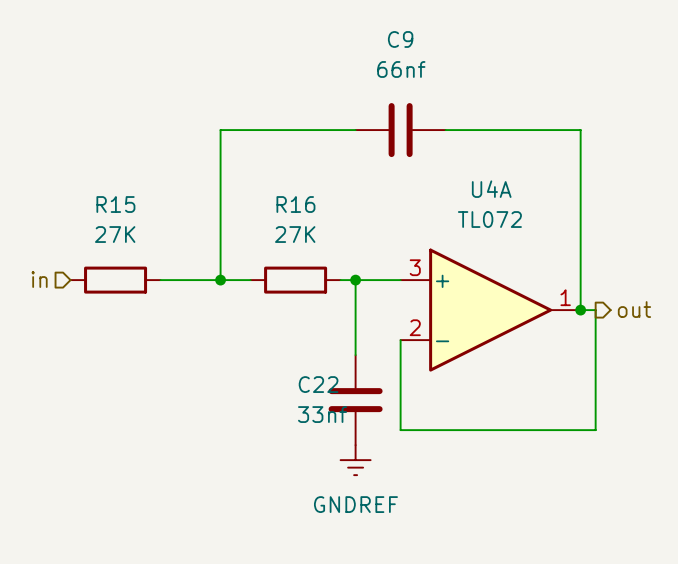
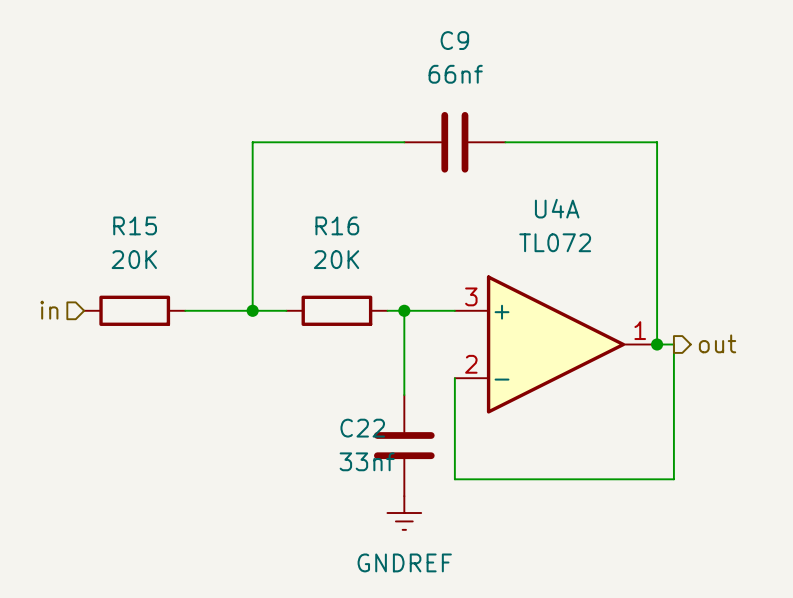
R15 value: 27K (115, 234) -> 20K (134, 259)
R16 value: 27K (295, 234) -> 20K (336, 259)

